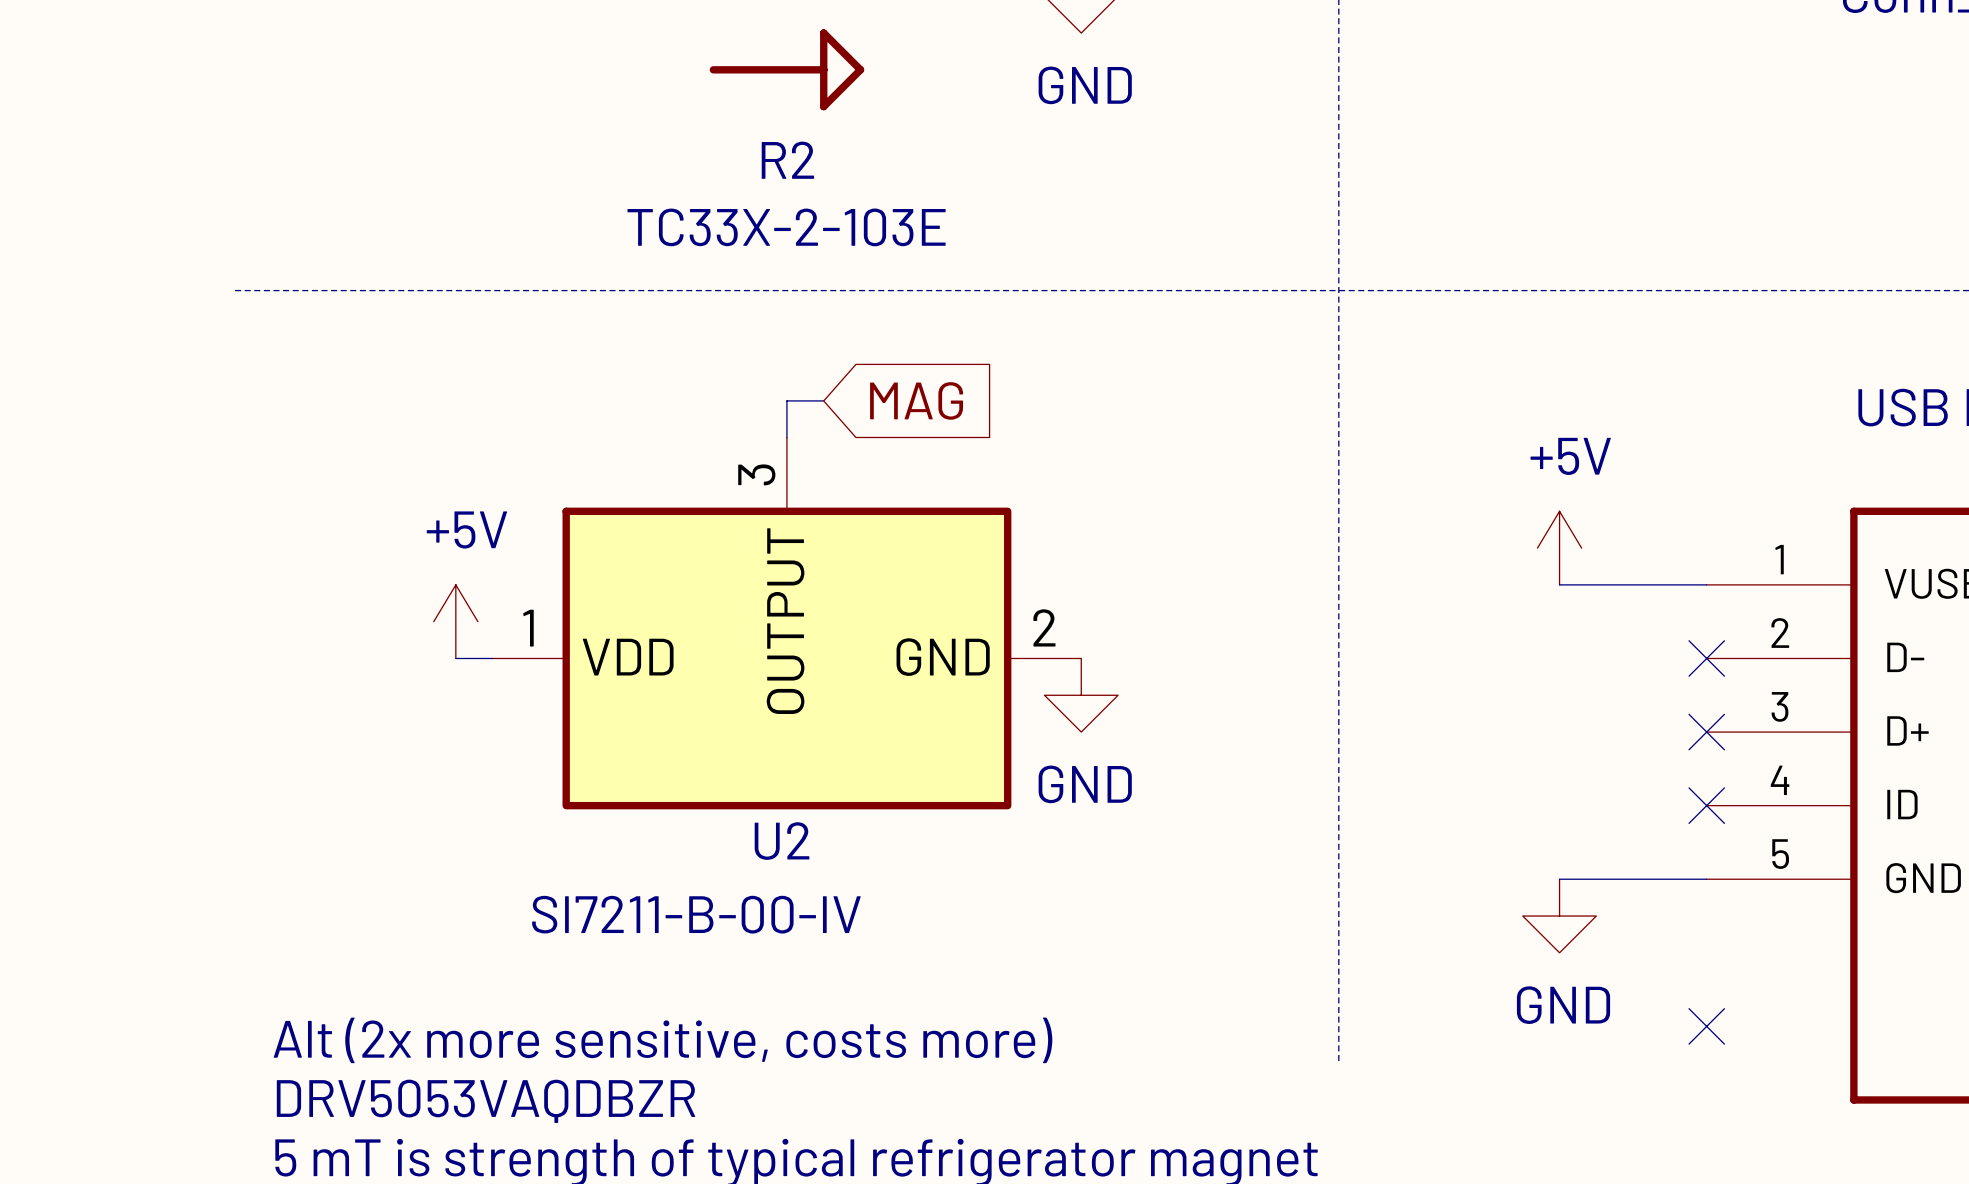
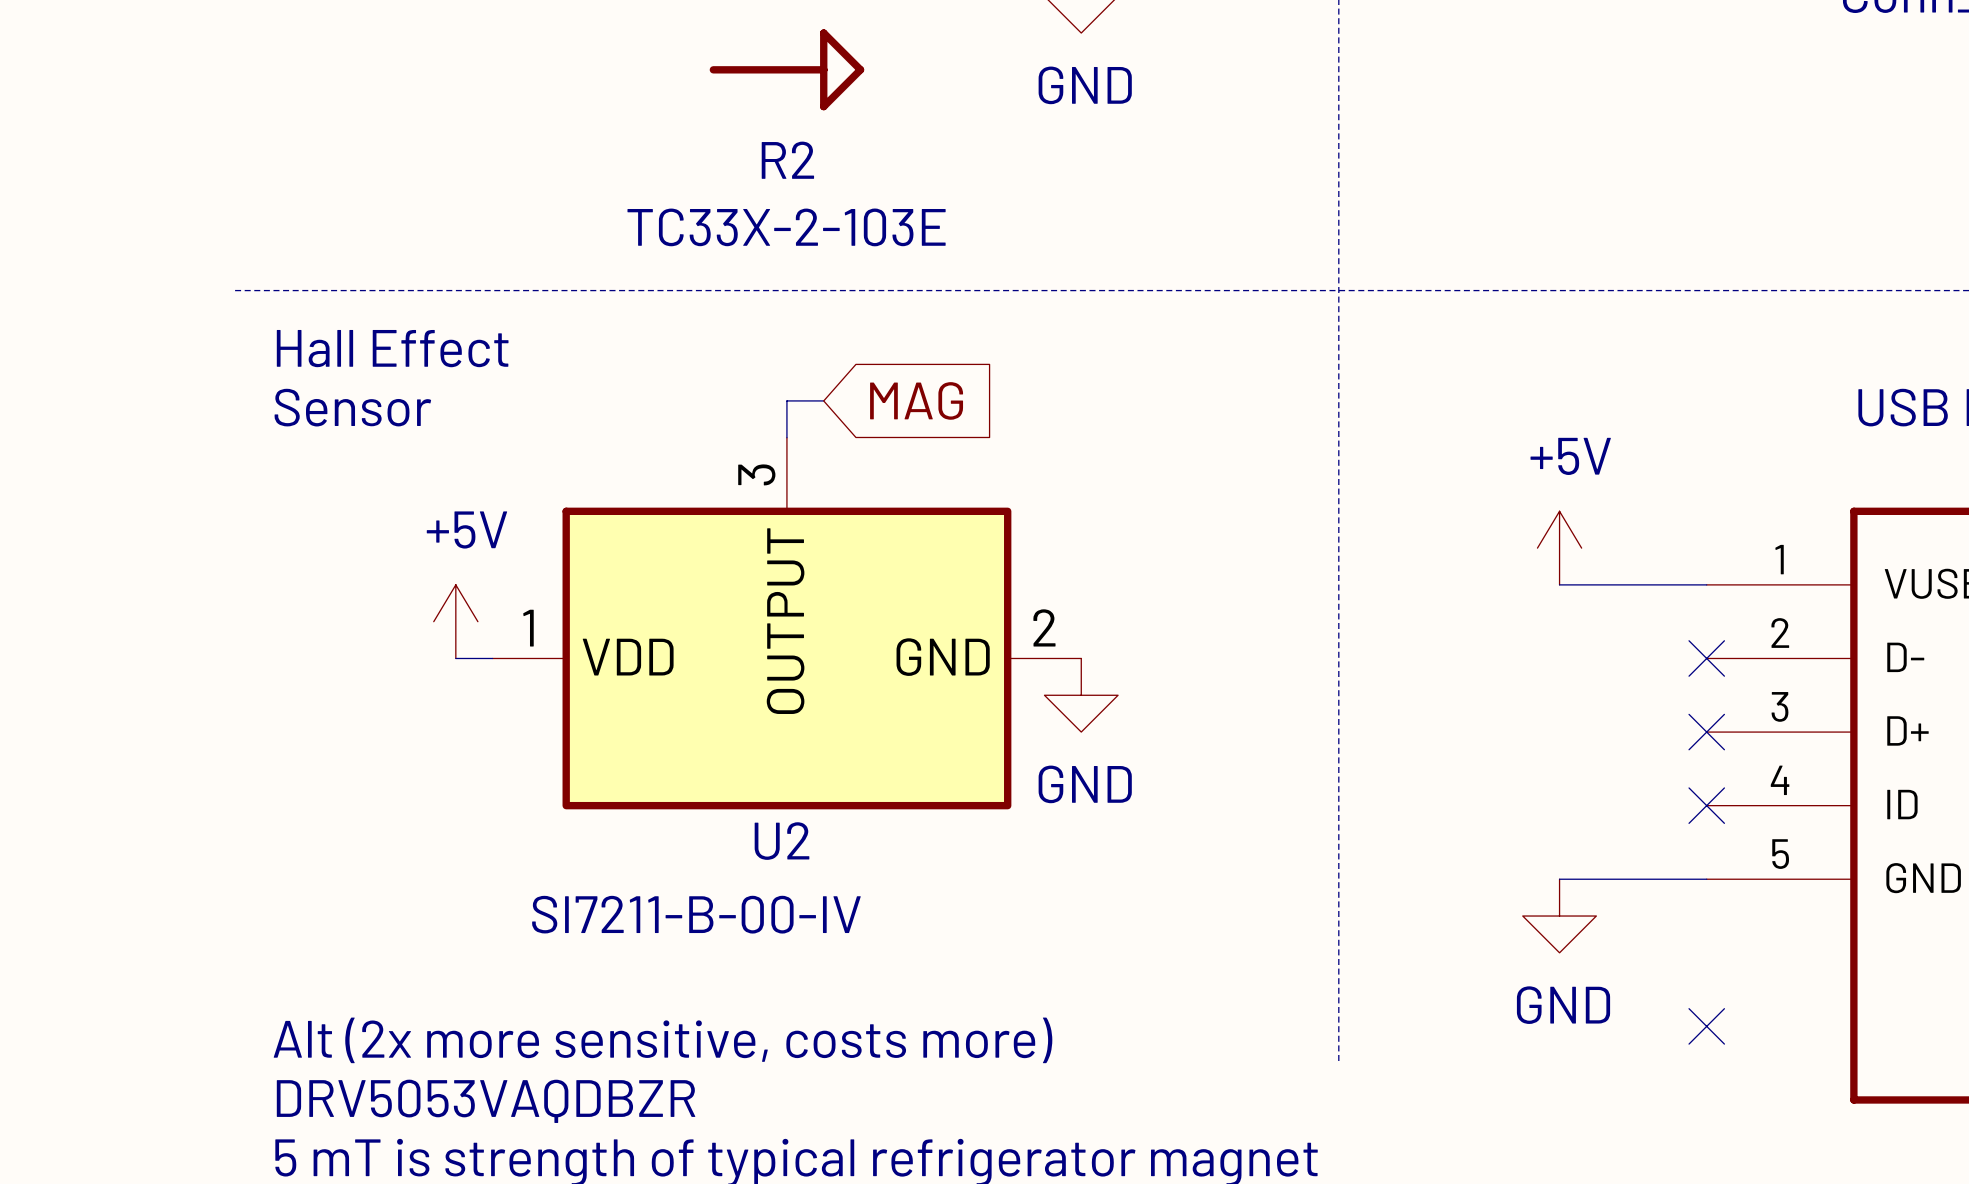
text: none -> Hall Effect (392, 348)
text: none -> Sensor (352, 407)

